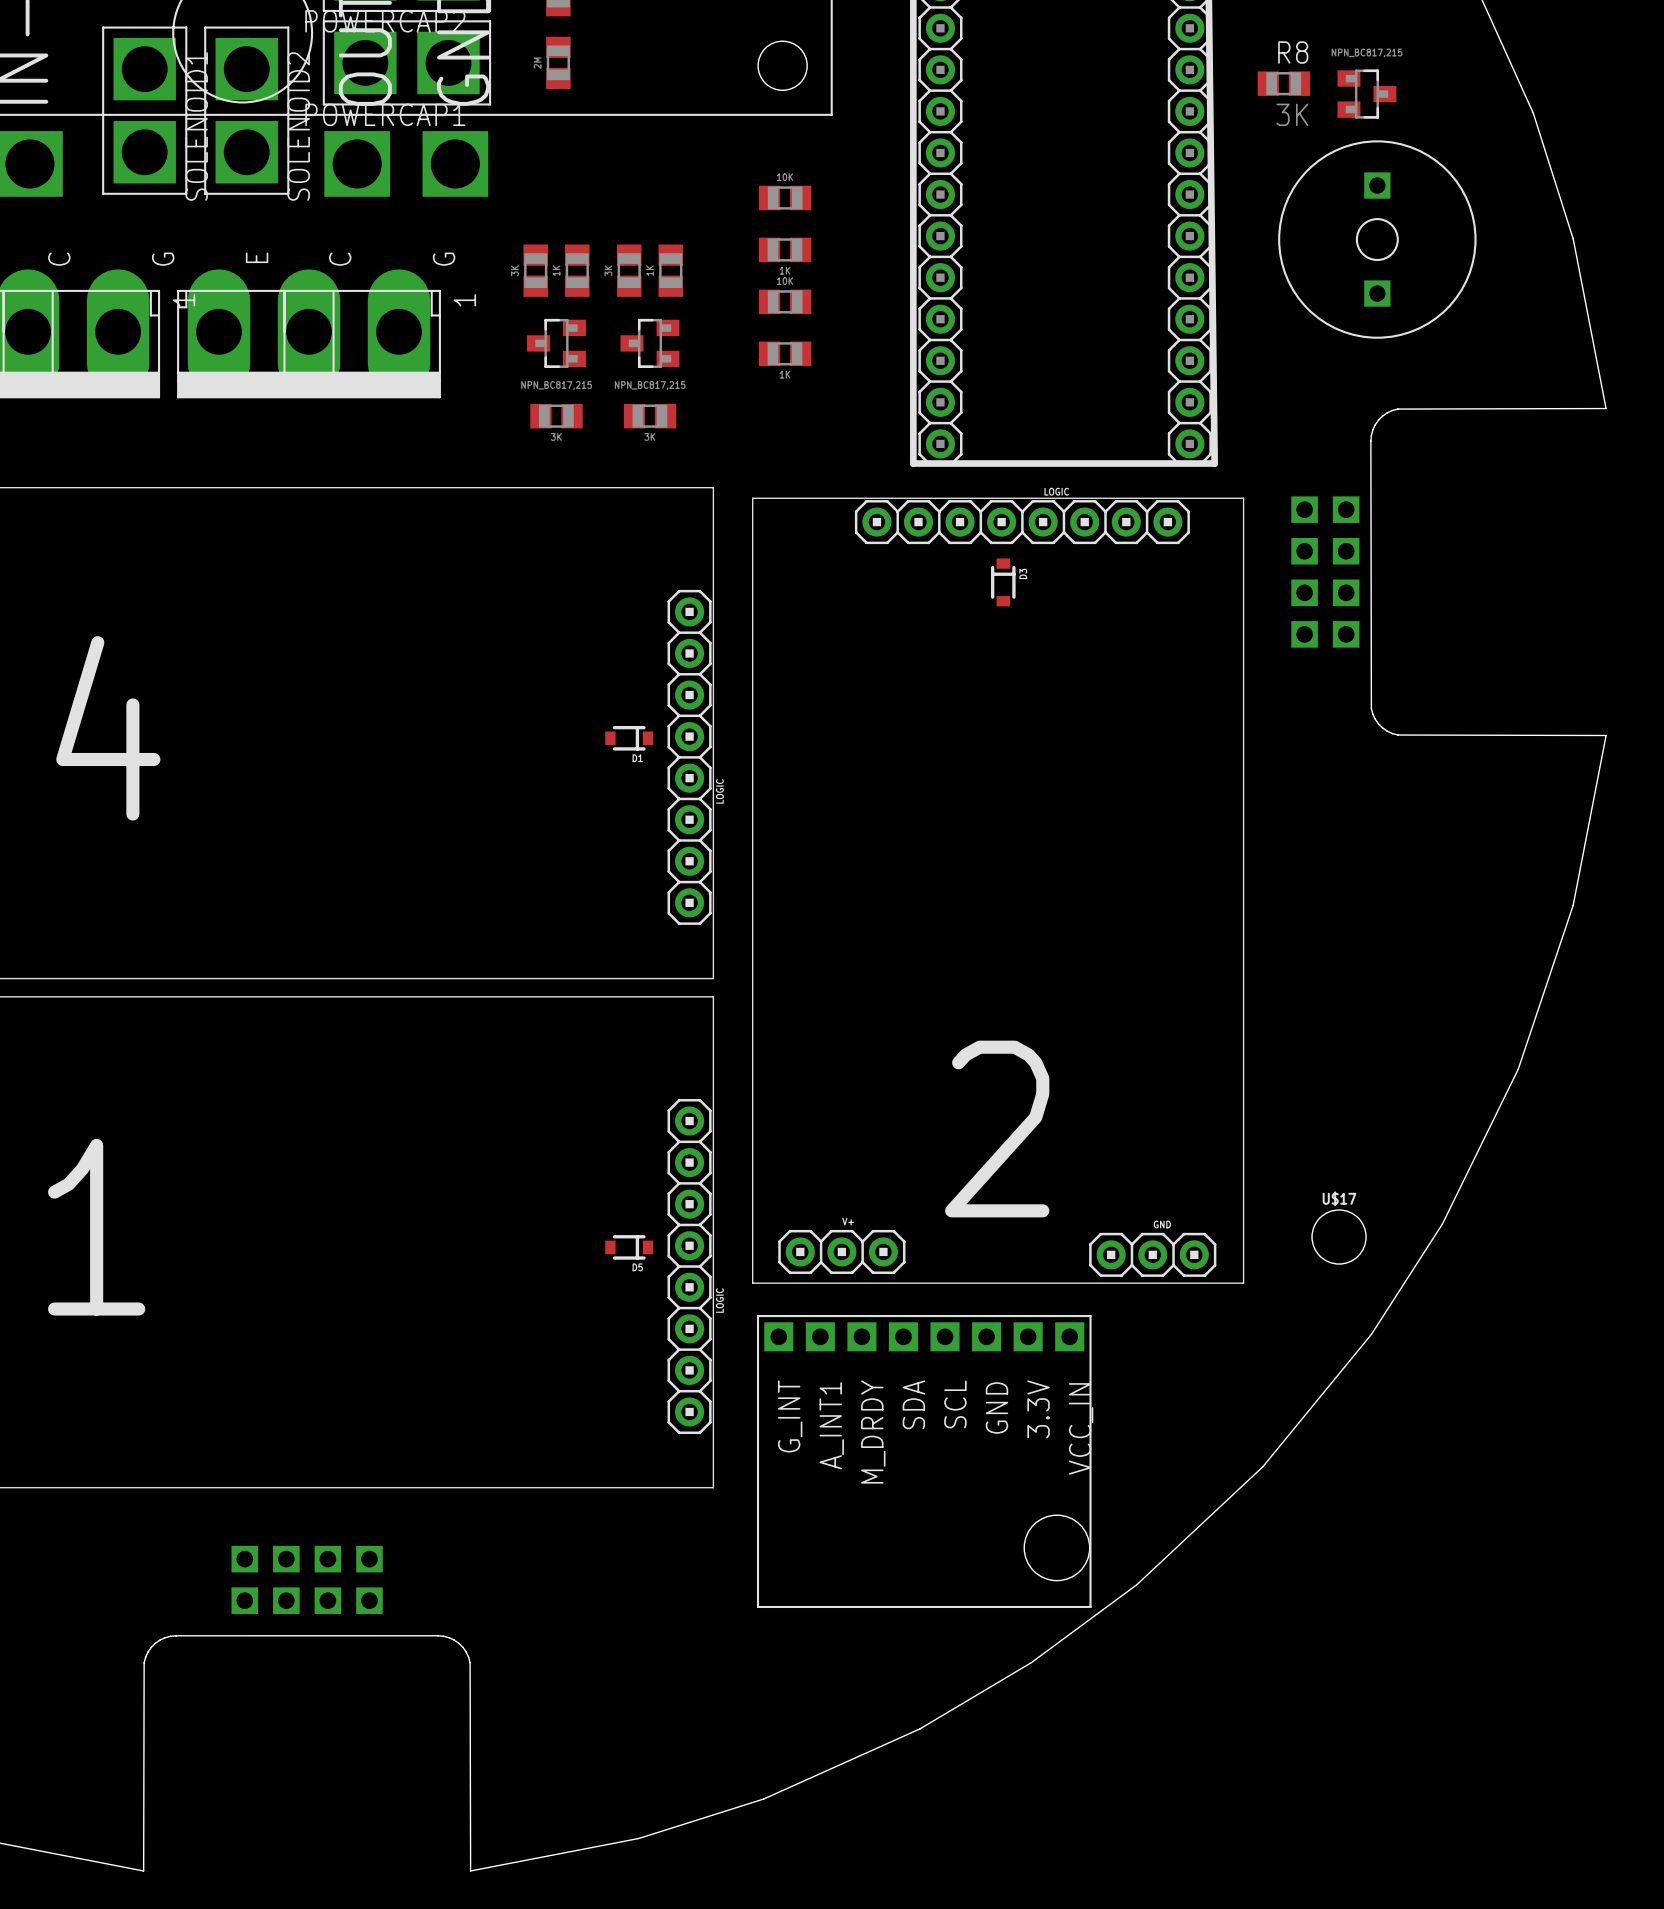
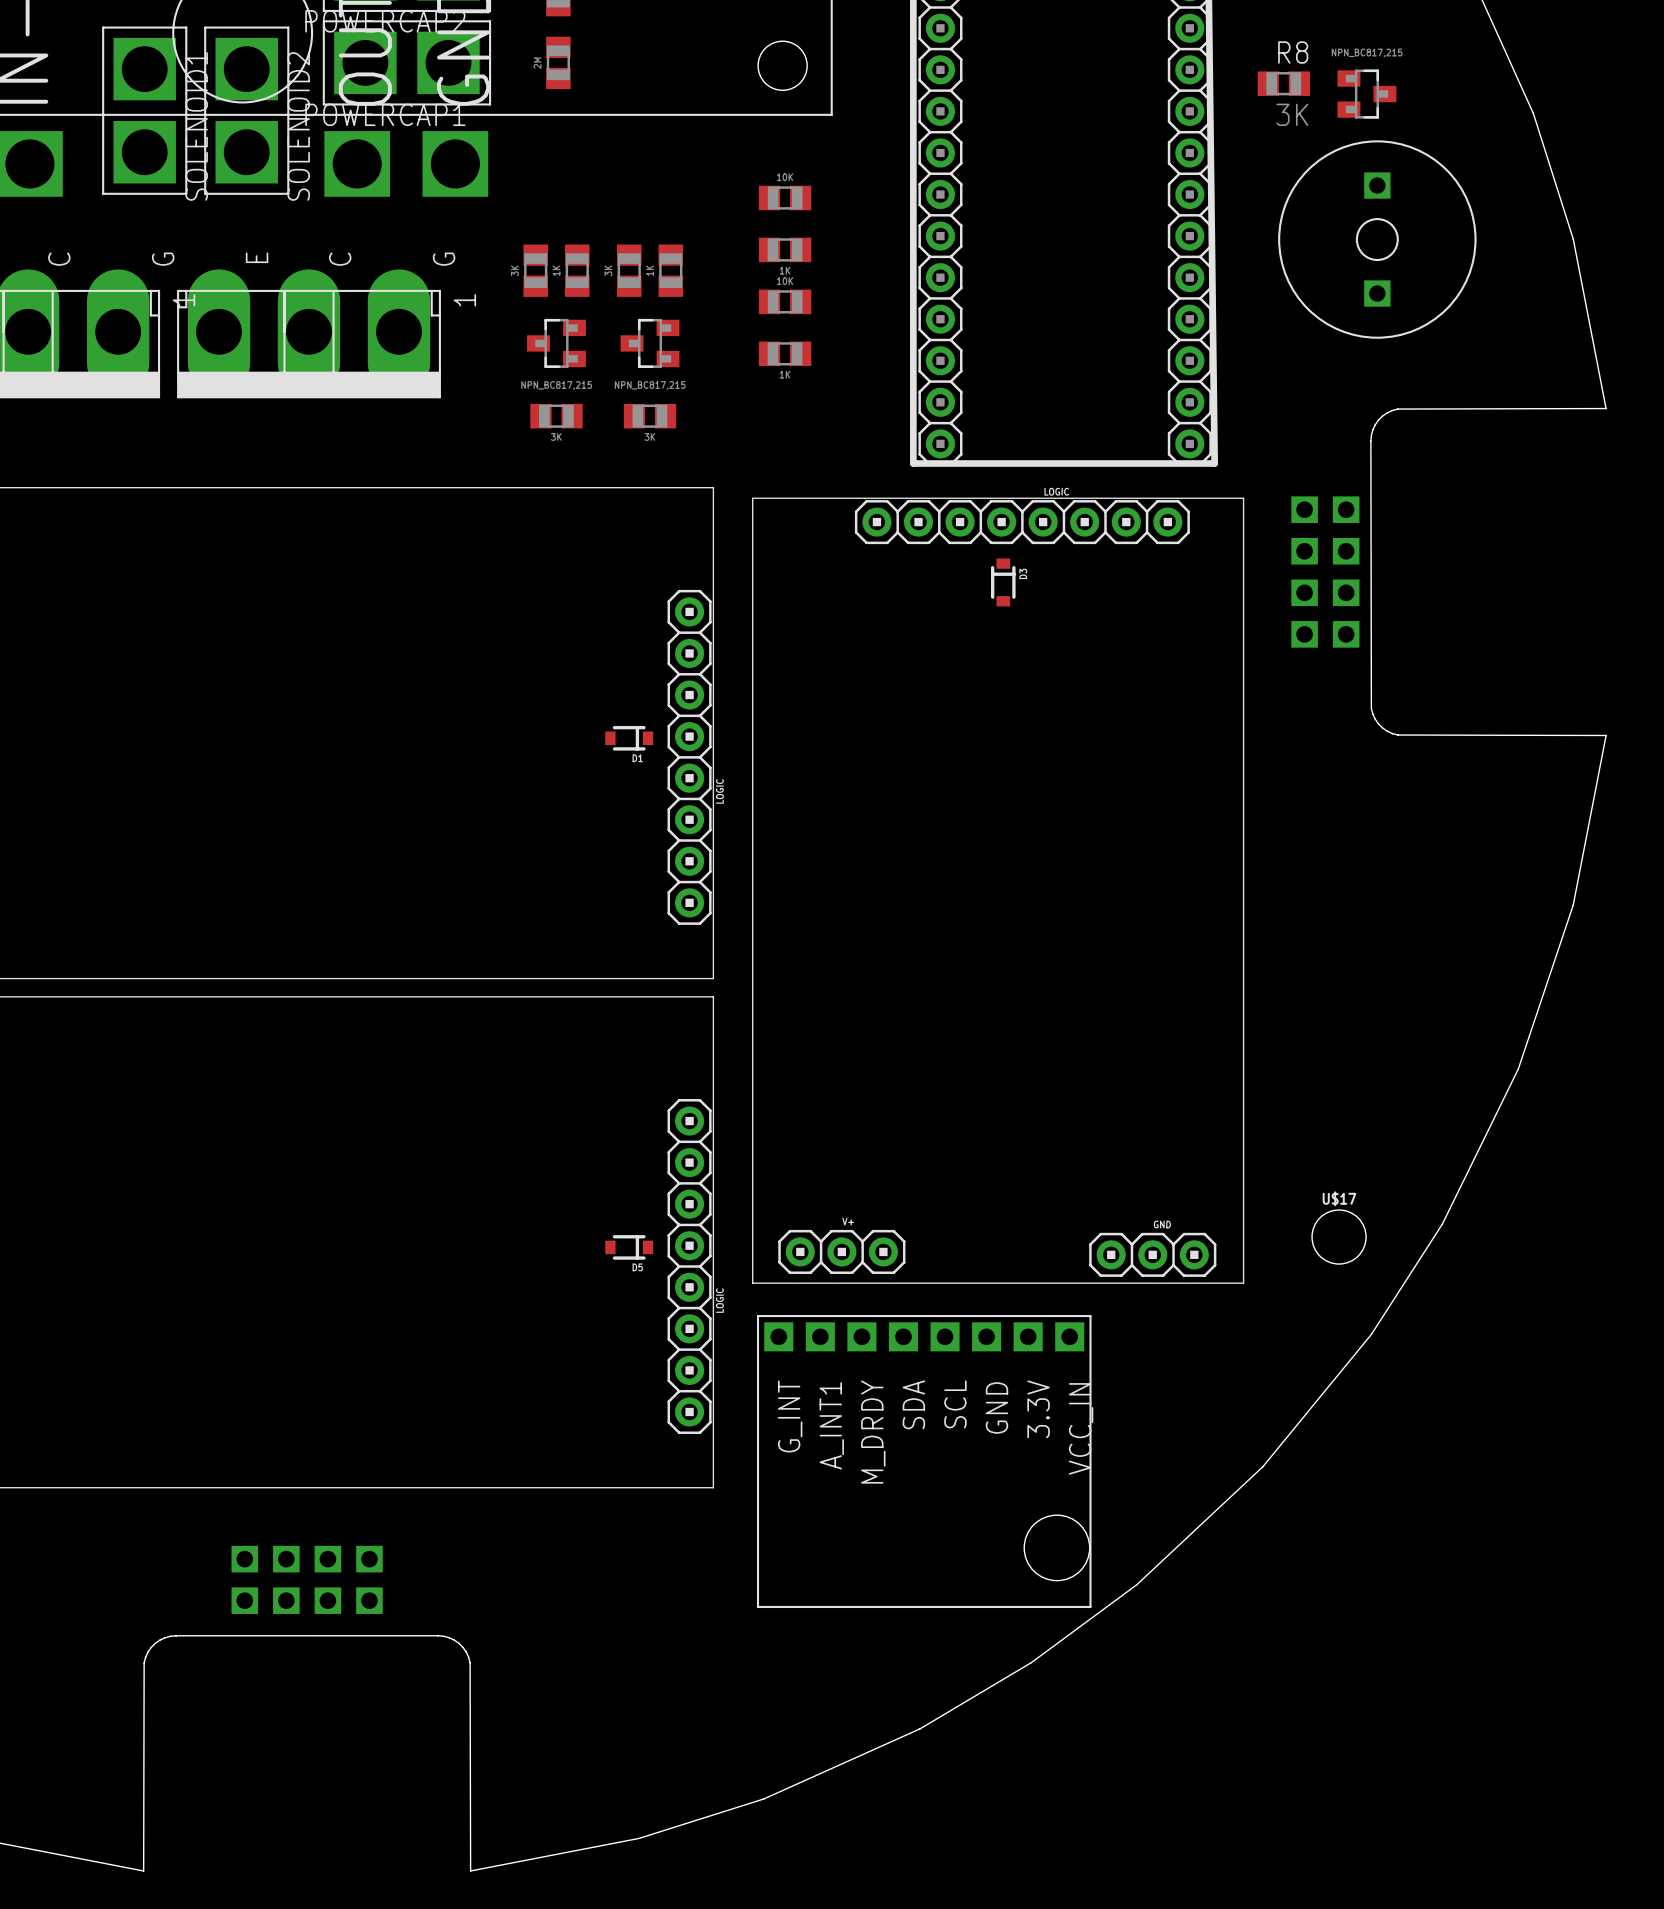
text: 4 (108, 728) -> none
text: 2 (997, 1129) -> none
text: 1 (96, 1227) -> none

